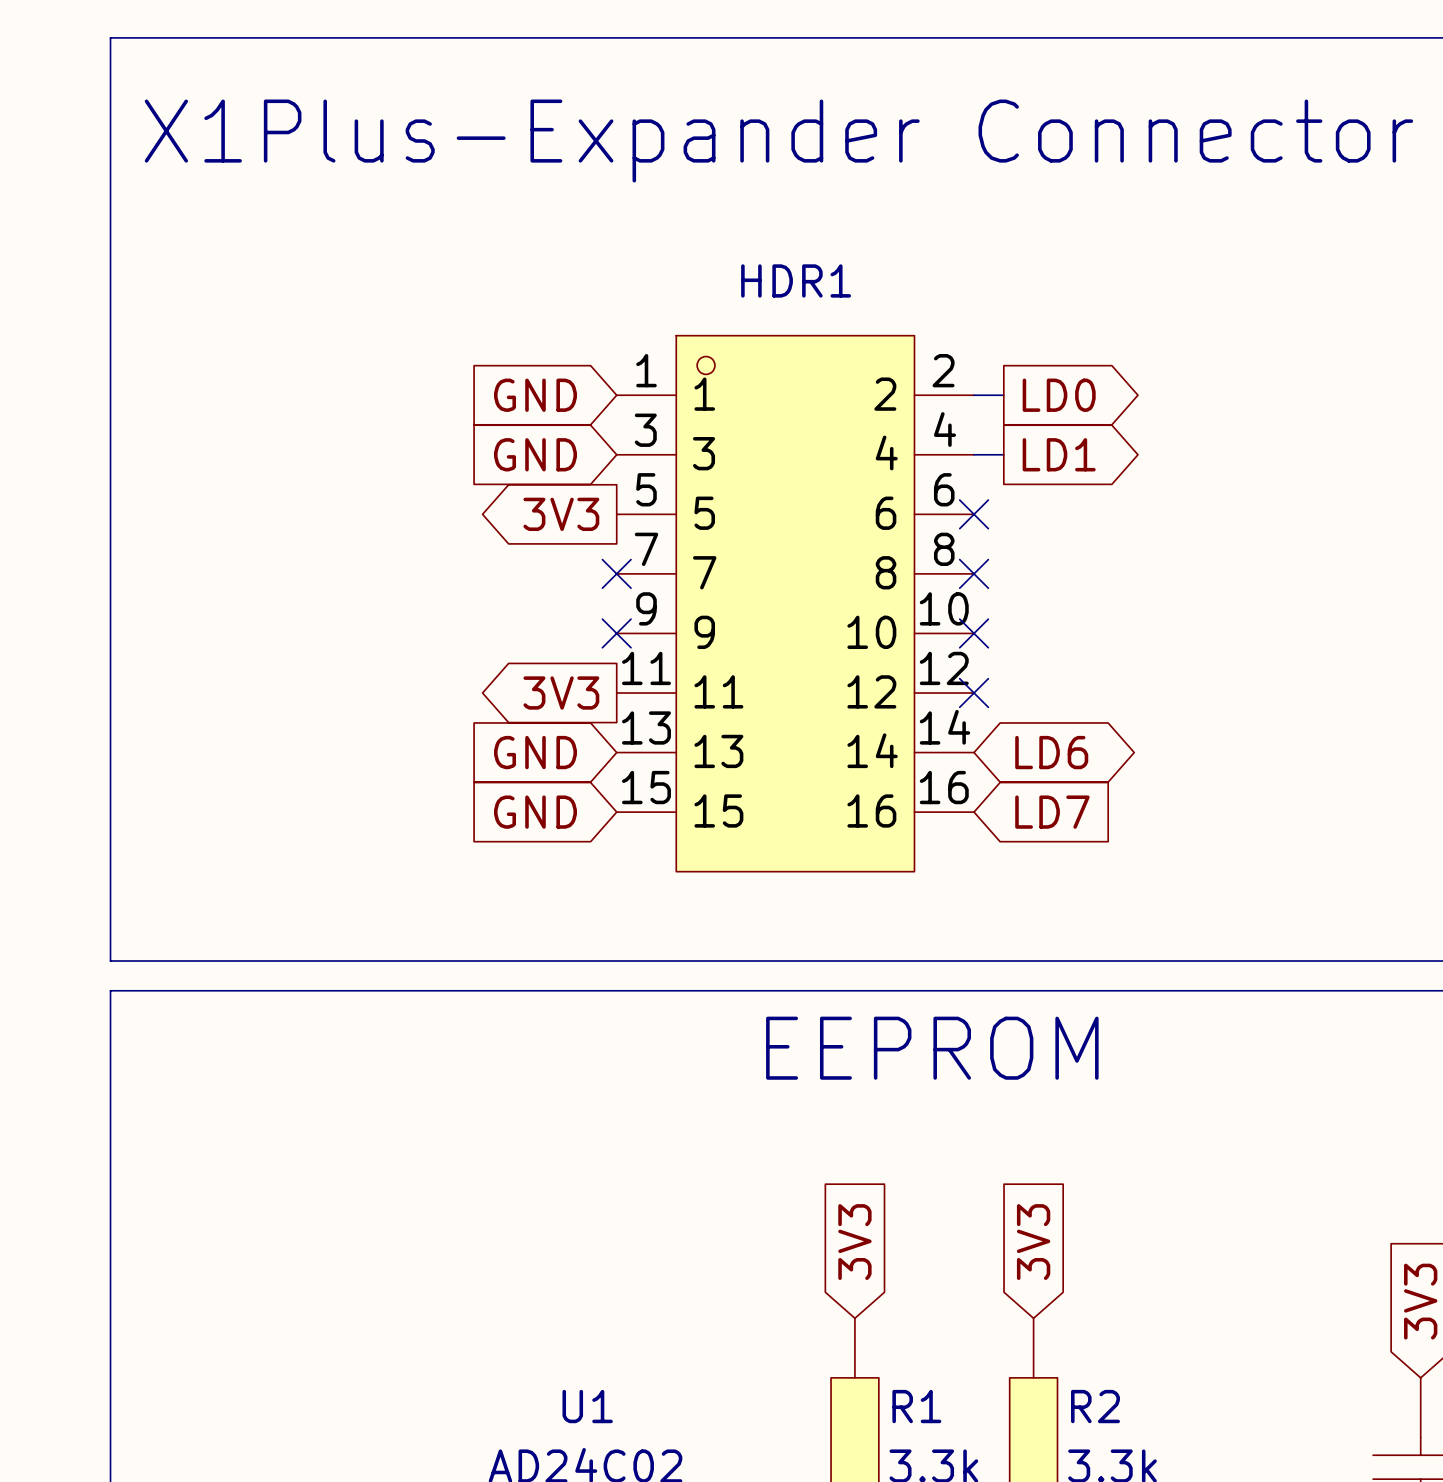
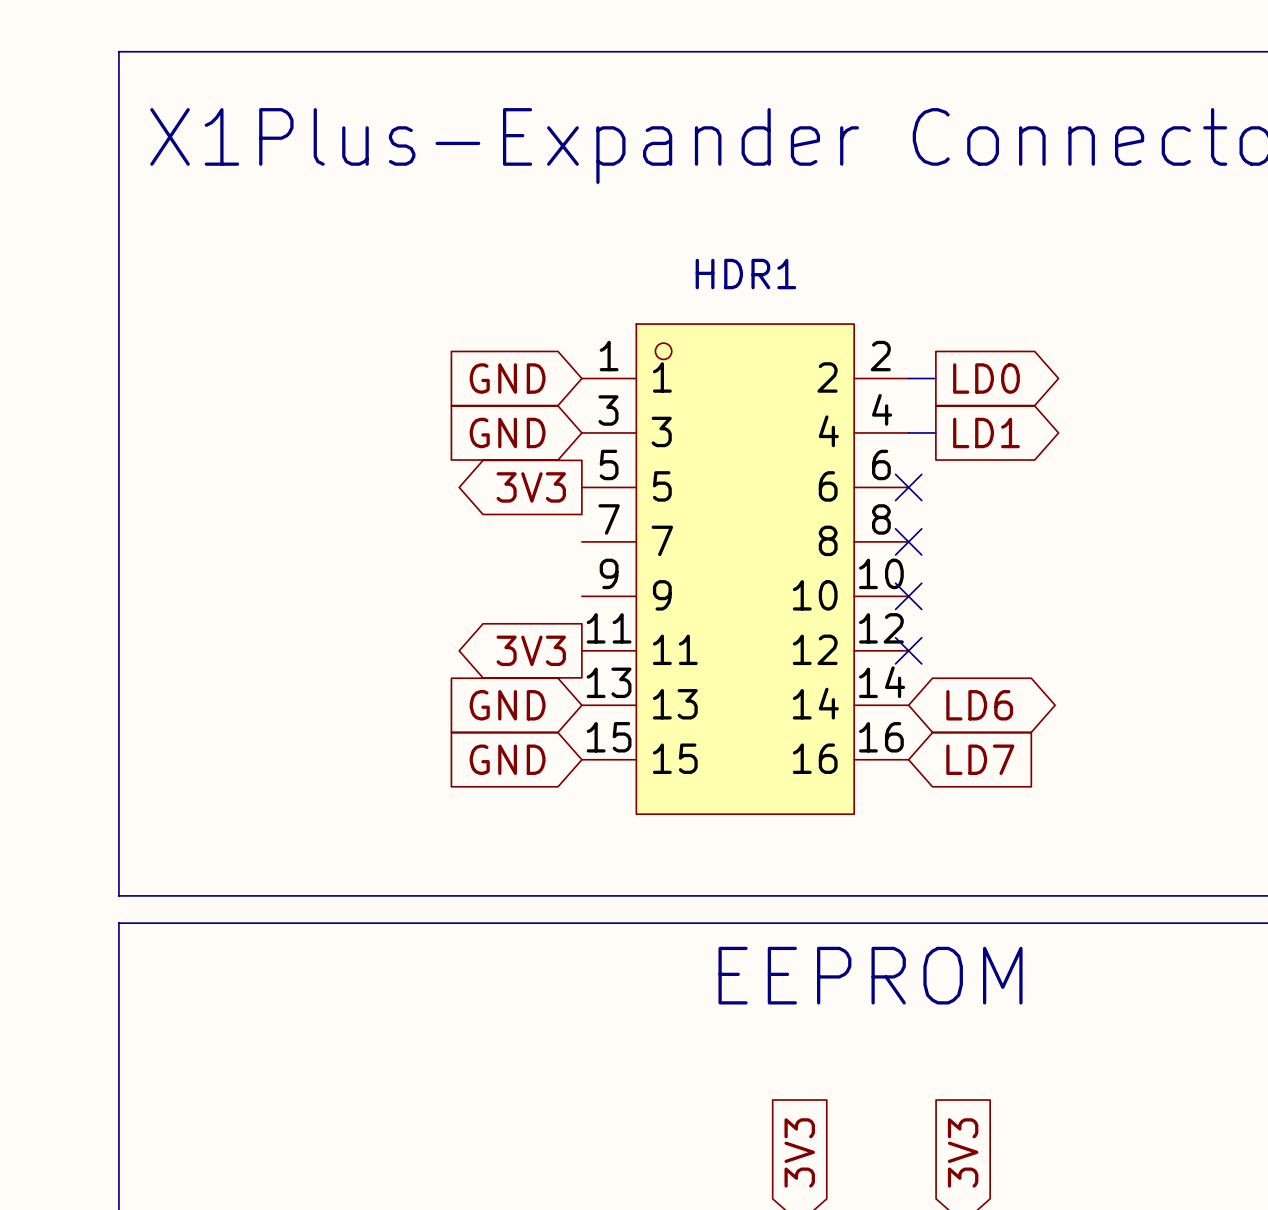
no-connect mark: (616, 573) -> none
no-connect mark: (616, 633) -> none

